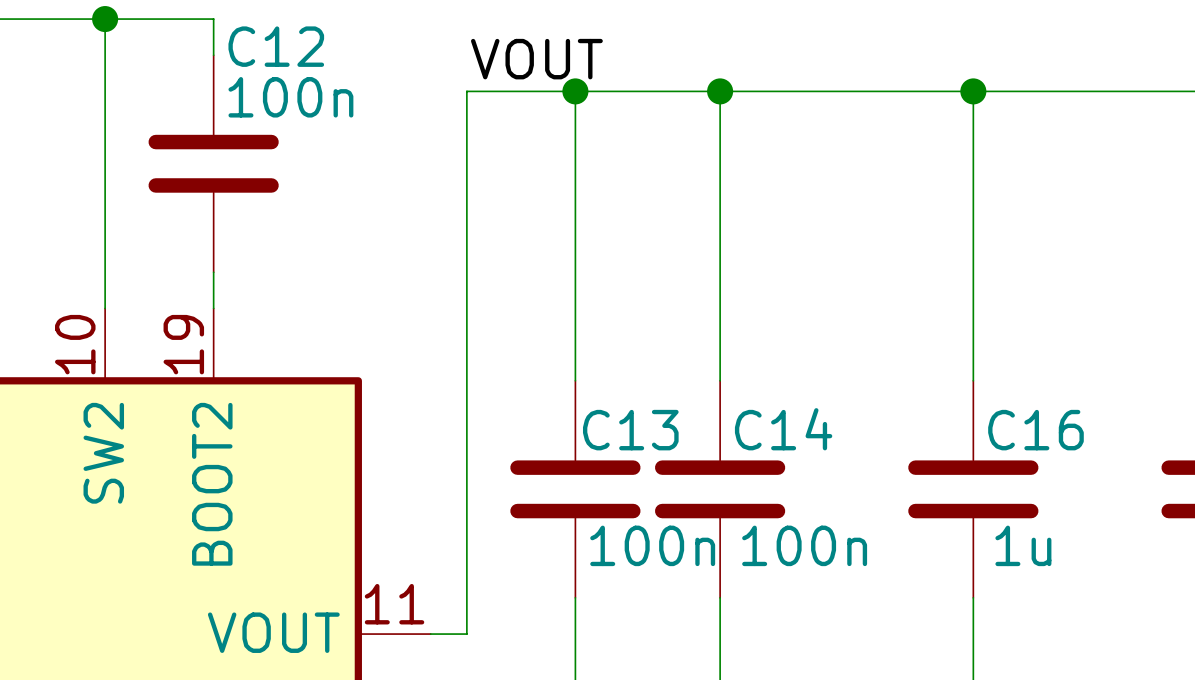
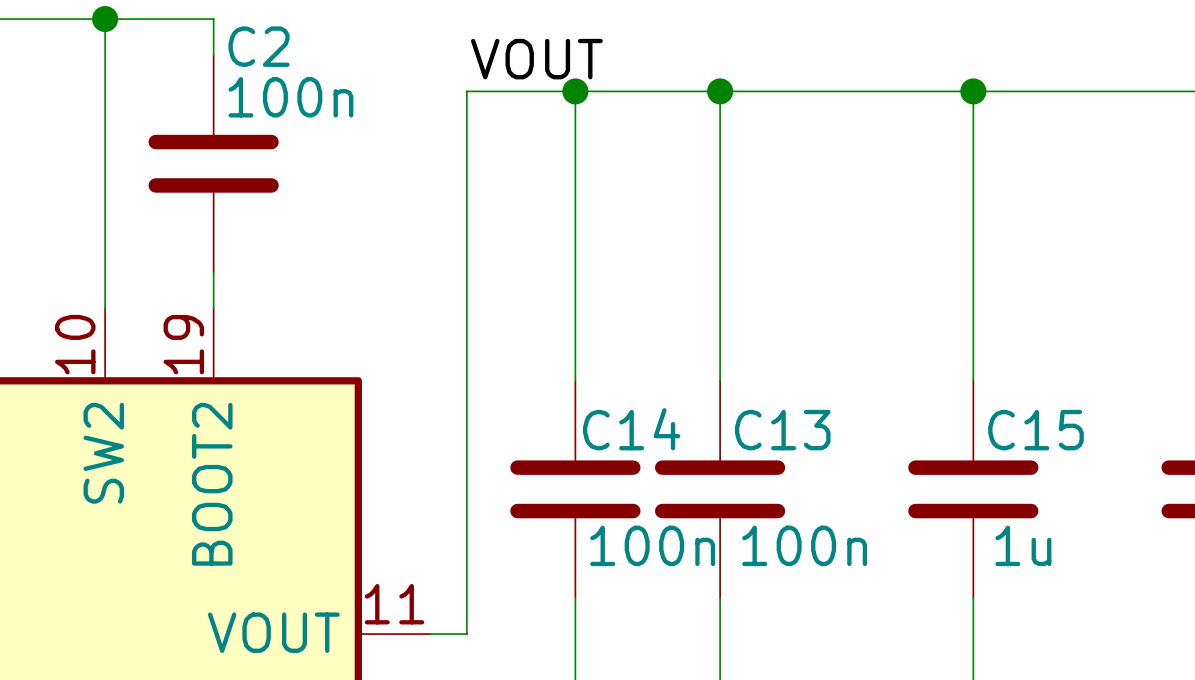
C12 name: C12 (276, 46) -> C2 (259, 46)
C14 name: C14 (783, 429) -> C13 (782, 430)
C13 name: C13 (630, 430) -> C14 (631, 429)
C16 name: C16 (1035, 430) -> C15 (1035, 430)

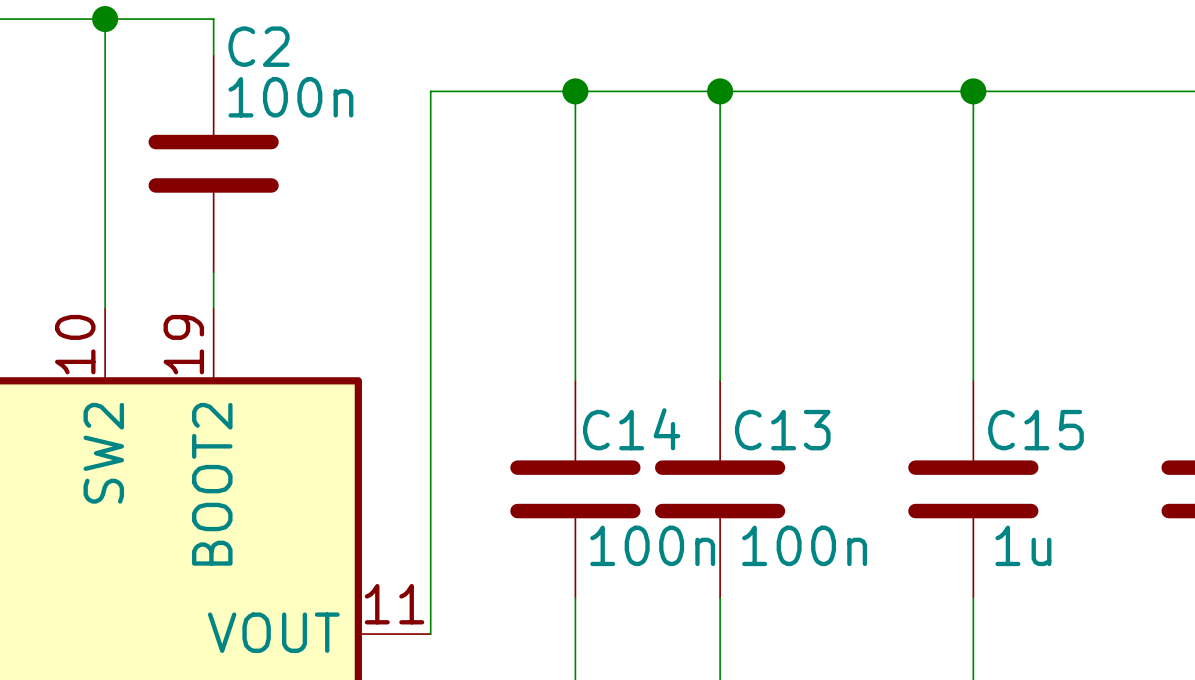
label: VOUT (536, 59) -> none
wire: (466, 91) (466, 634) (430, 634) -> (466, 91) (430, 91) (430, 634)

